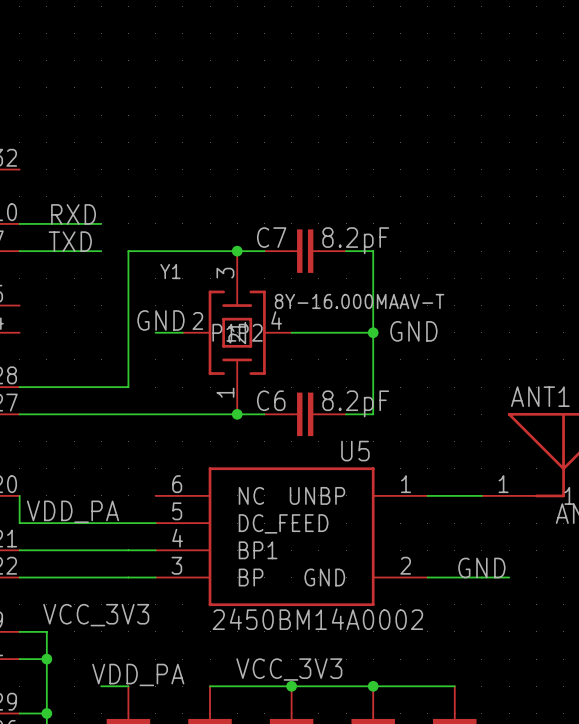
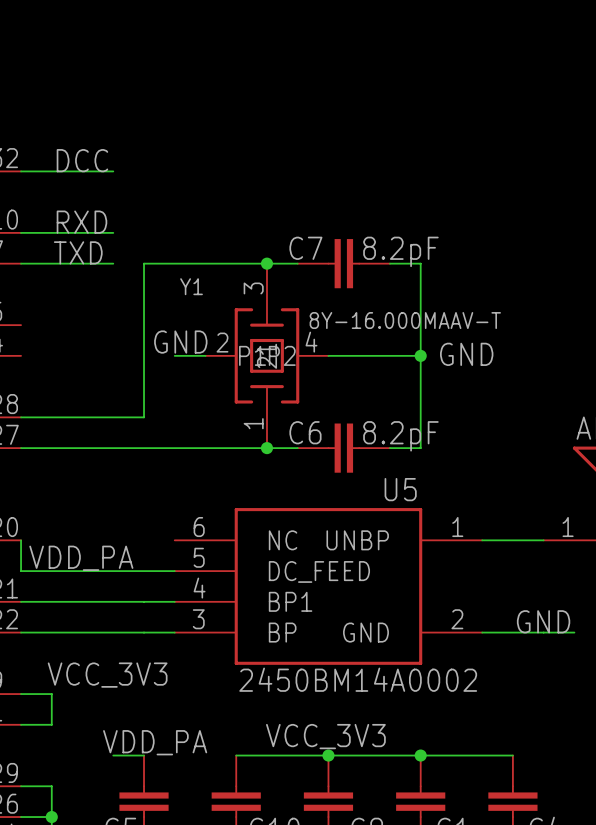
label: none -> DCC (82, 160)
wire: none -> (21, 171) (113, 171)
wire: (46, 659) (46, 713) -> none
junction: (46, 659) -> none
junction: (46, 713) -> none

